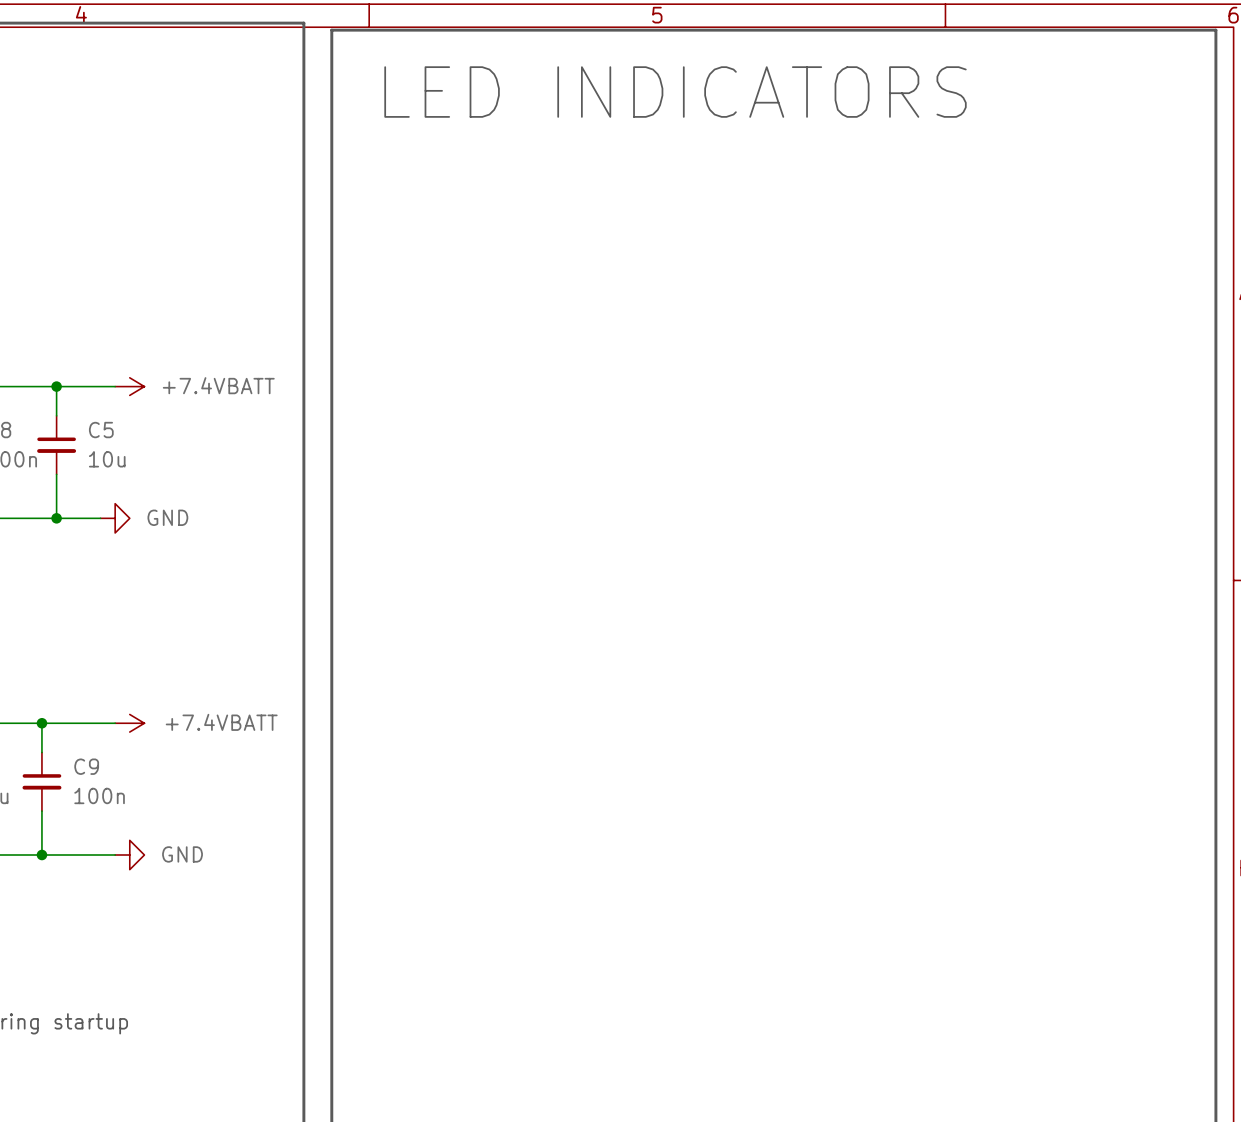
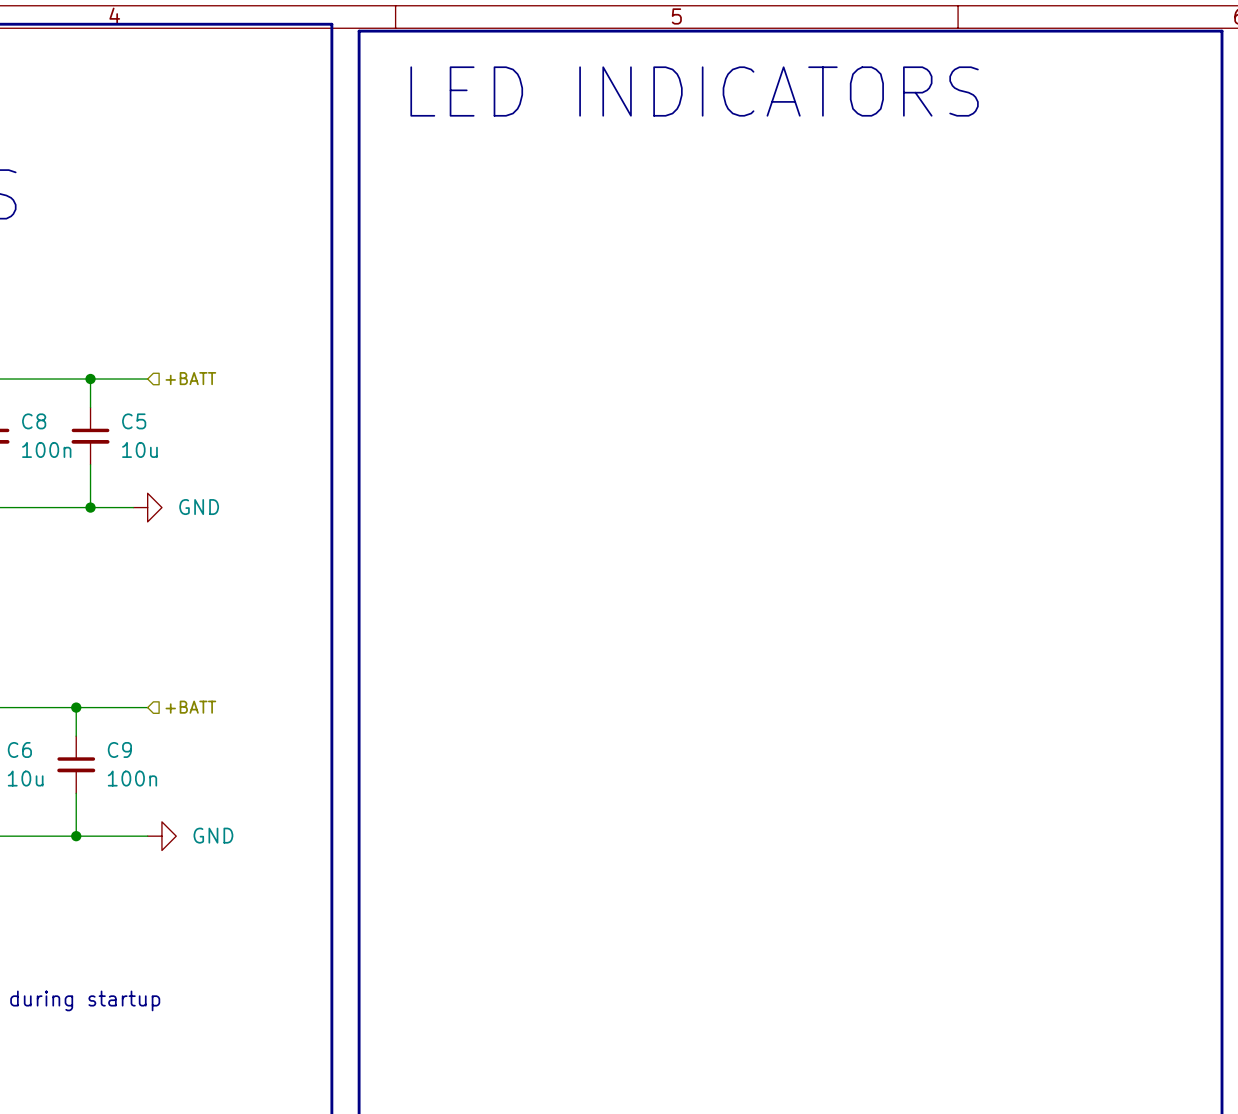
power symbol: +7.4VBATT (129, 386) -> none
hierarchical label: none -> +BATT (190, 378)
hierarchical label: none -> +BATT (190, 707)
power symbol: +7.4VBATT (129, 723) -> none

